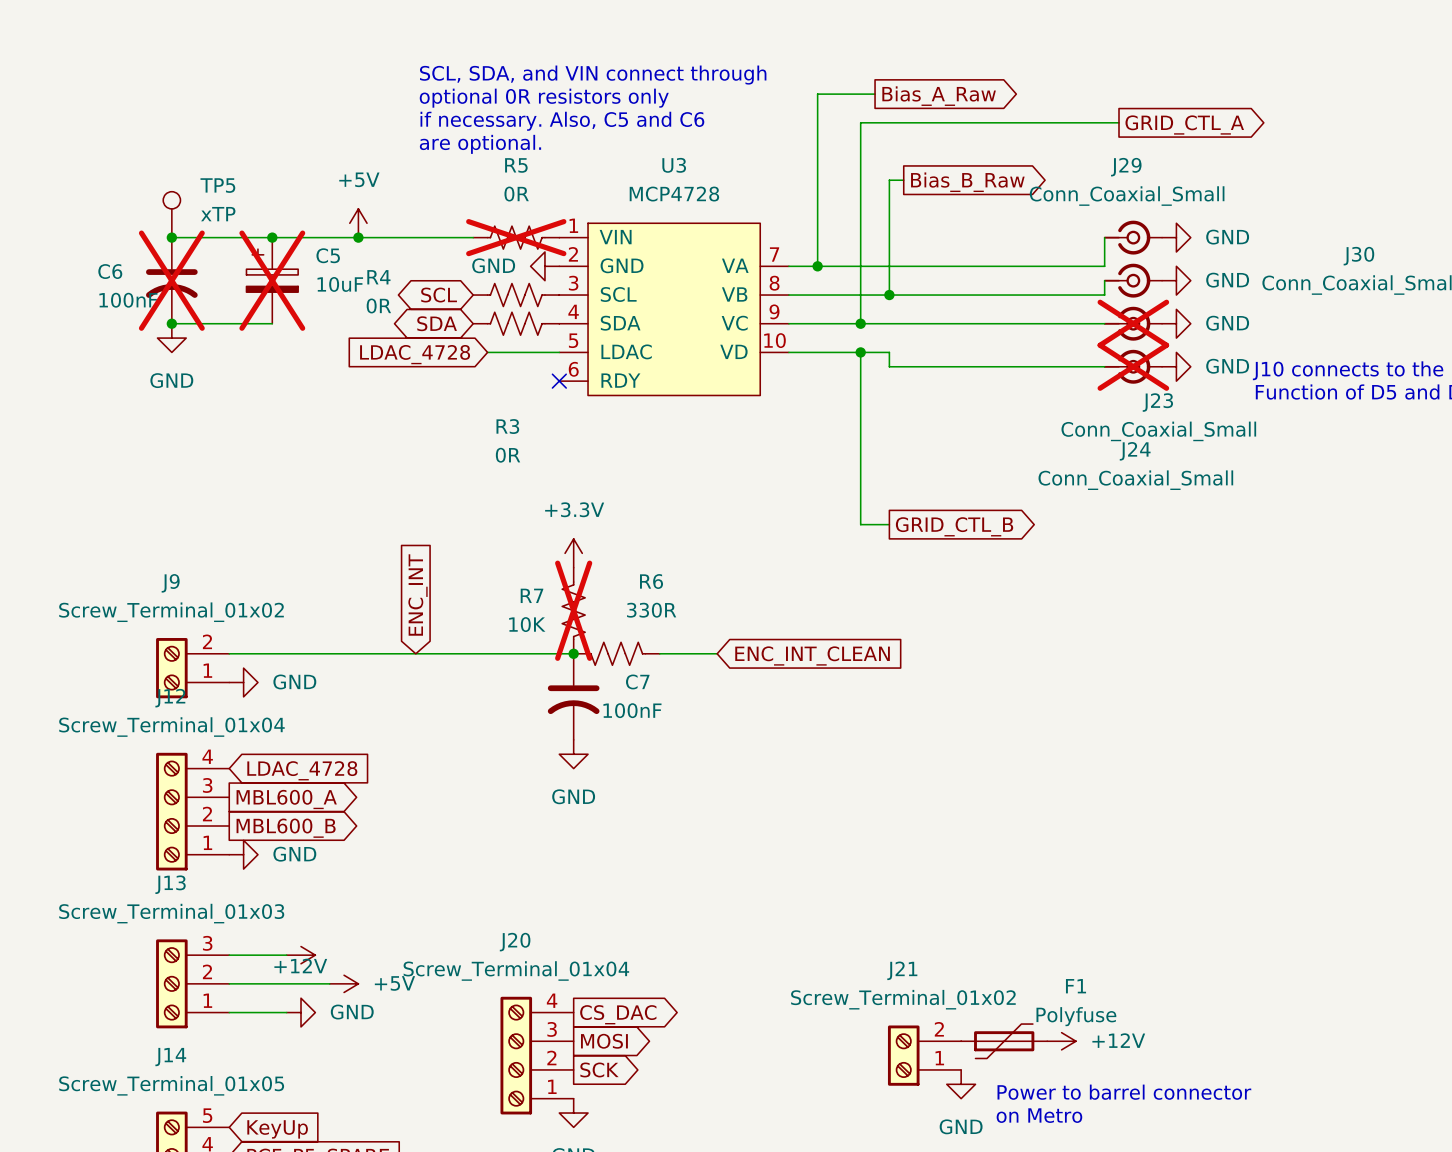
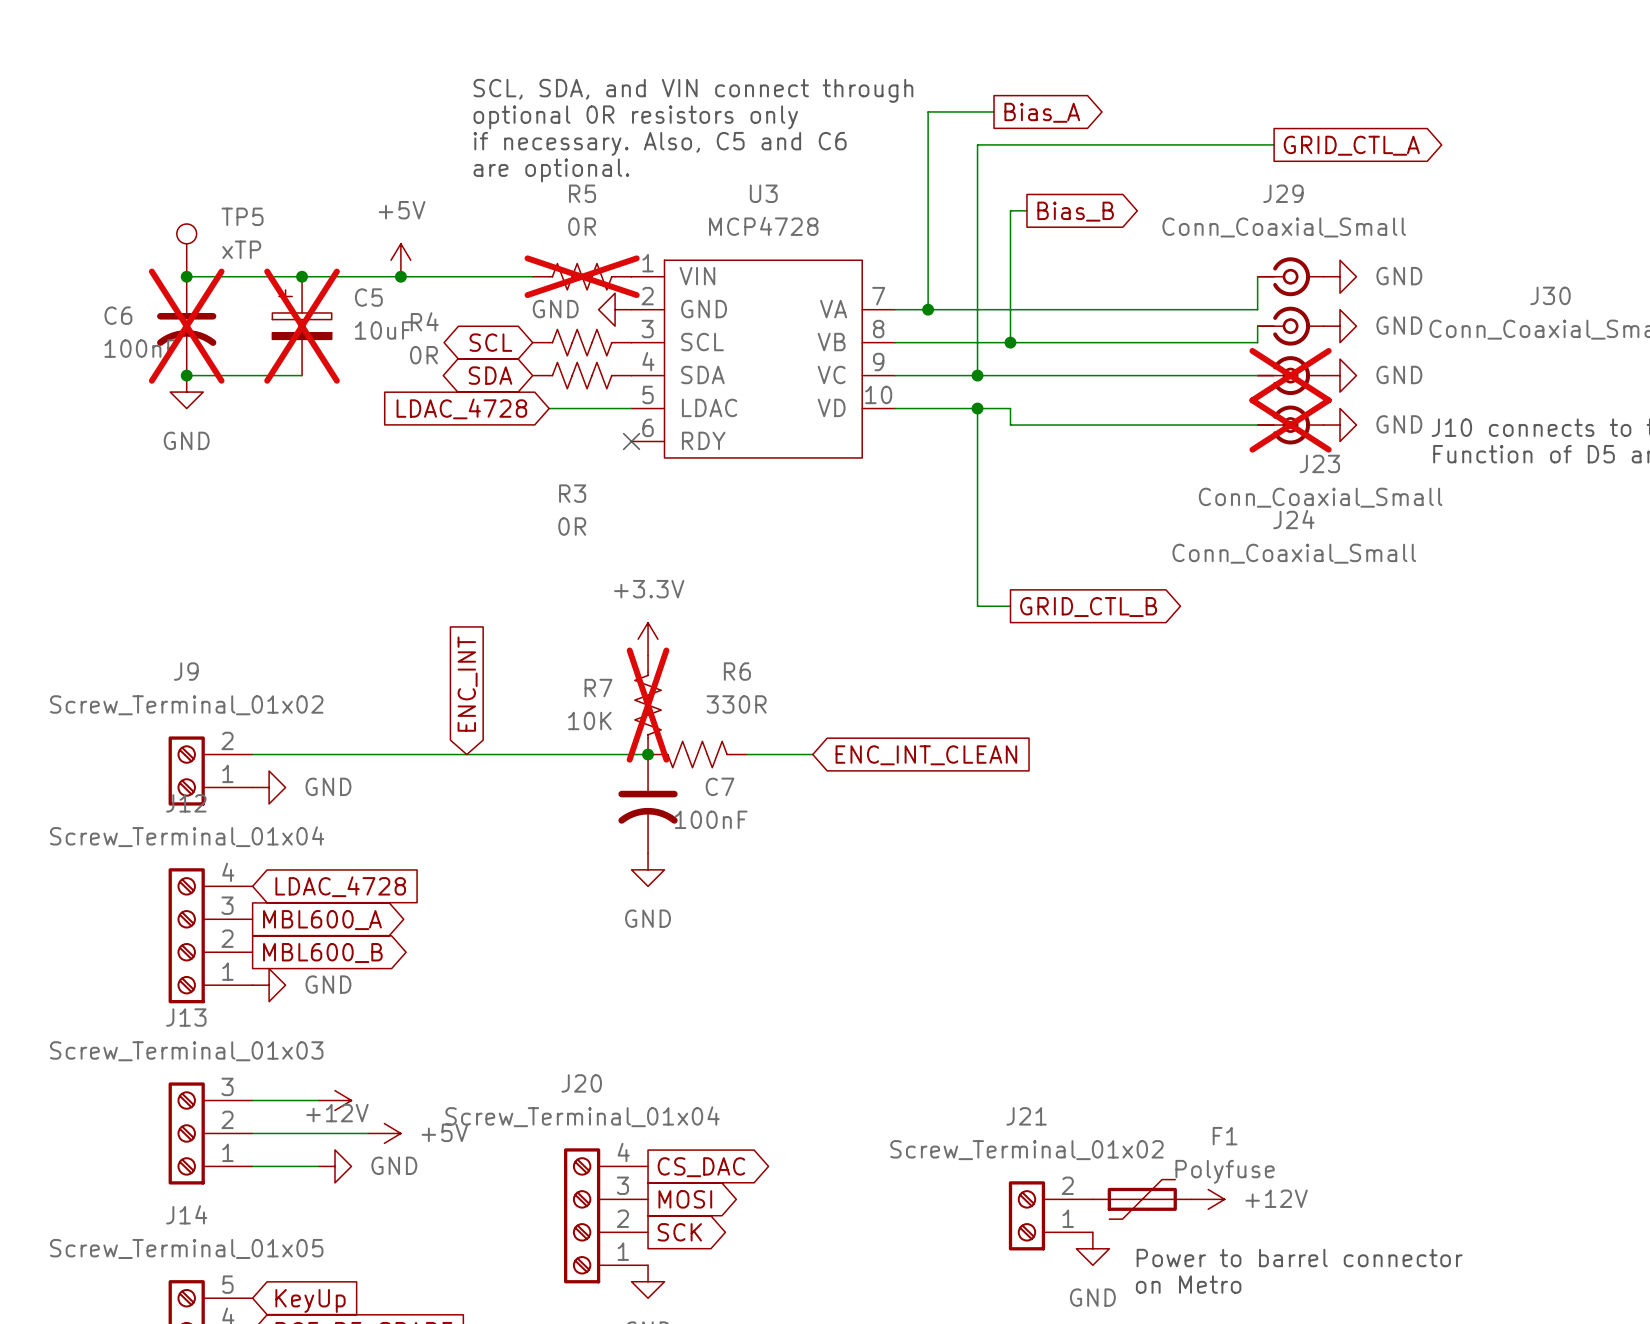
global label: Bias_A_Raw (939, 96) -> Bias_A (1042, 112)
global label: Bias_B_Raw (967, 182) -> Bias_B (1075, 211)

